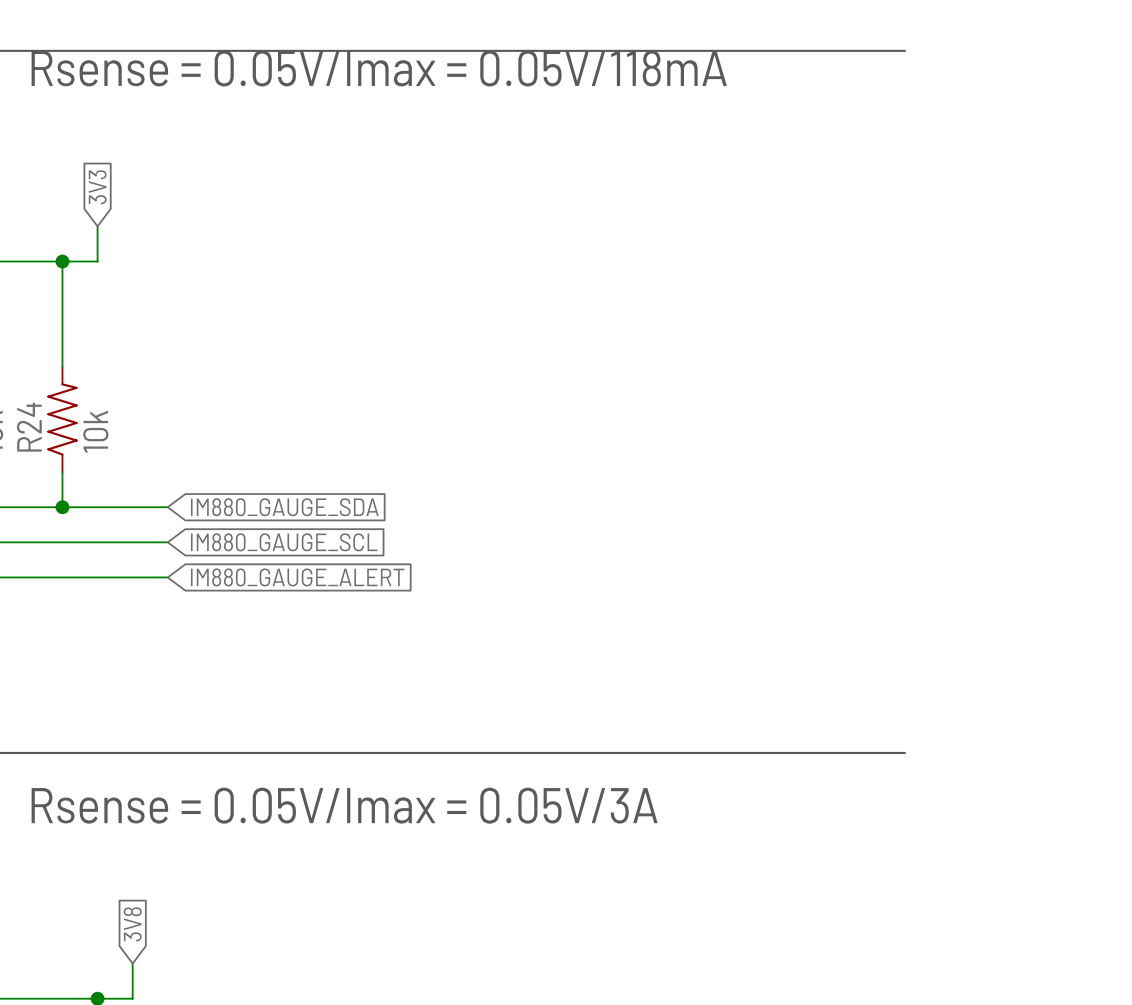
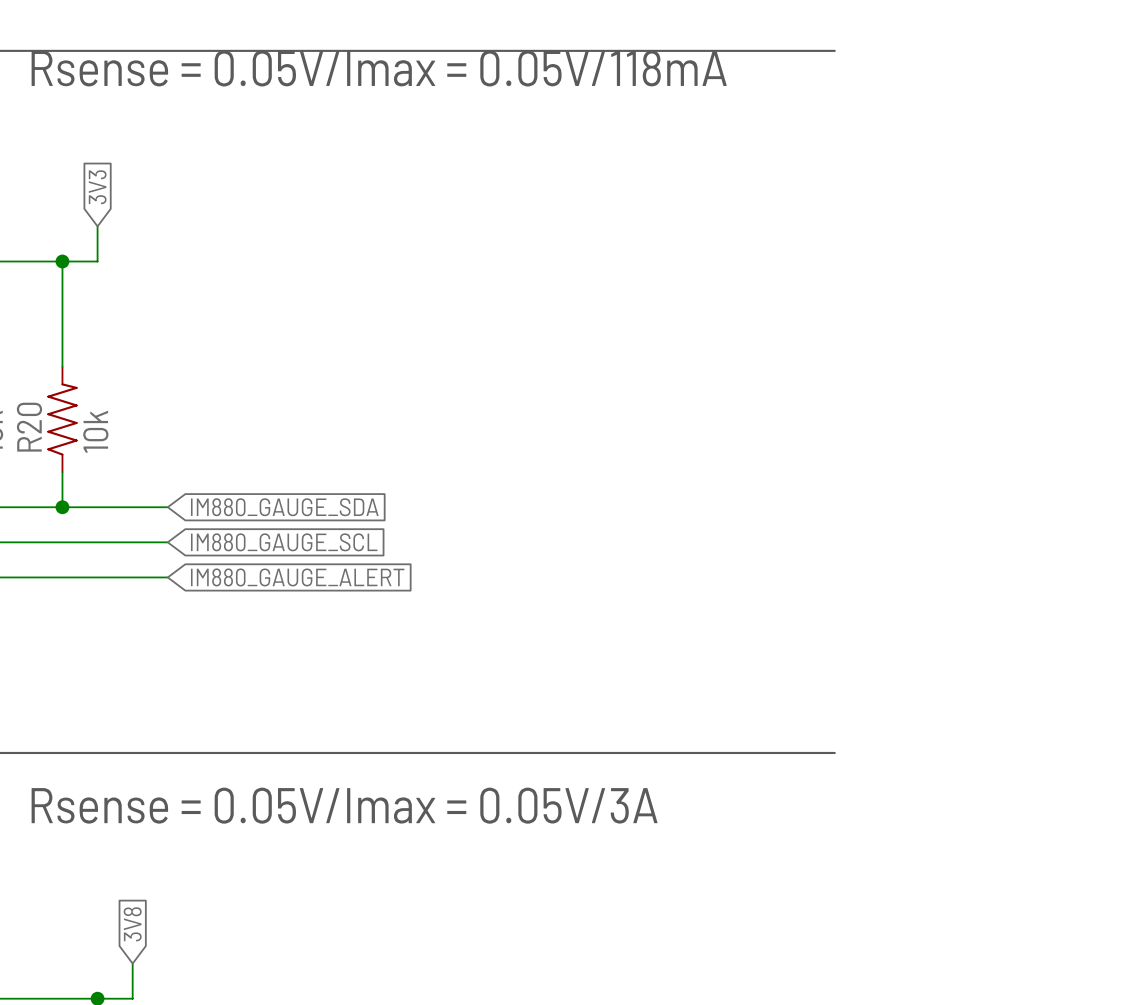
line: (834, 50) (904, 50) -> none
R24 name: R24 (29, 427) -> R20 (29, 427)
line: (834, 752) (904, 752) -> none

